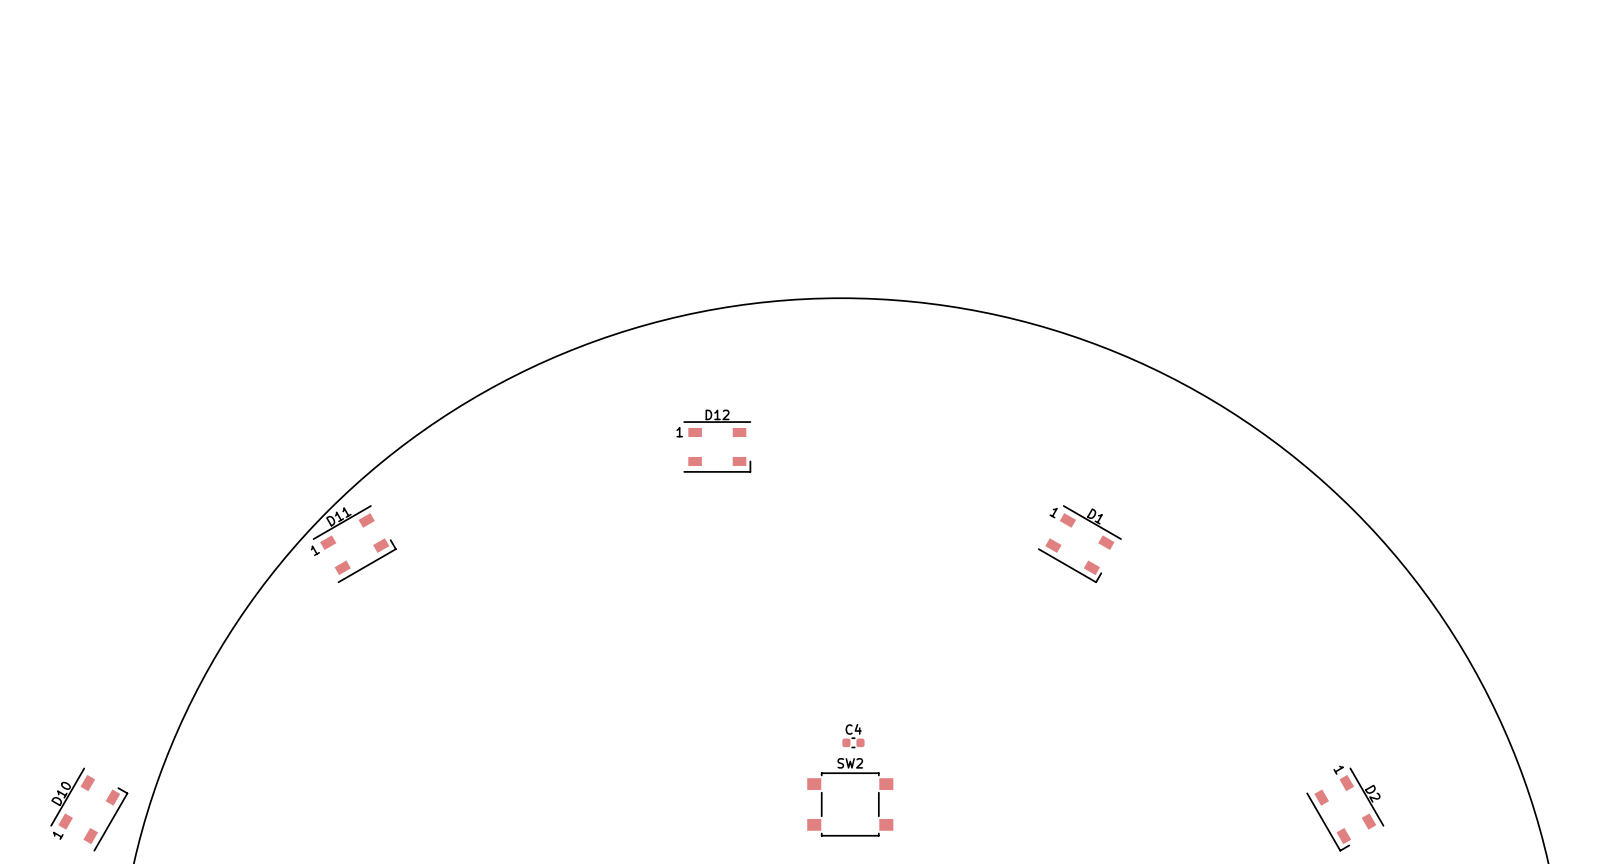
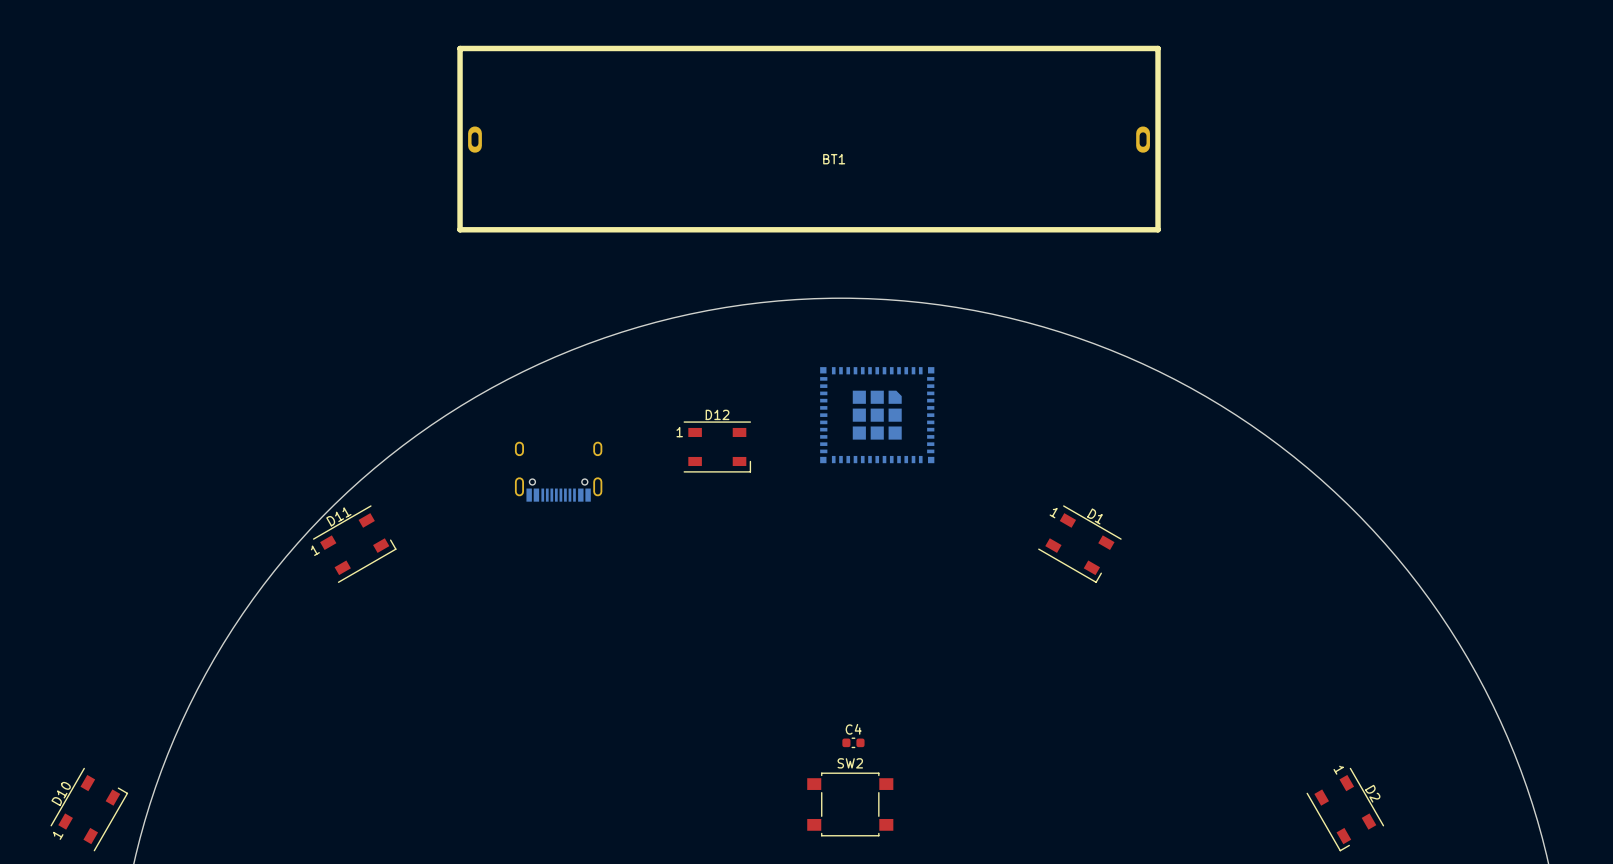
BT1: none -> (809, 139)
part: none -> (877, 415)
part: none -> (558, 471)

